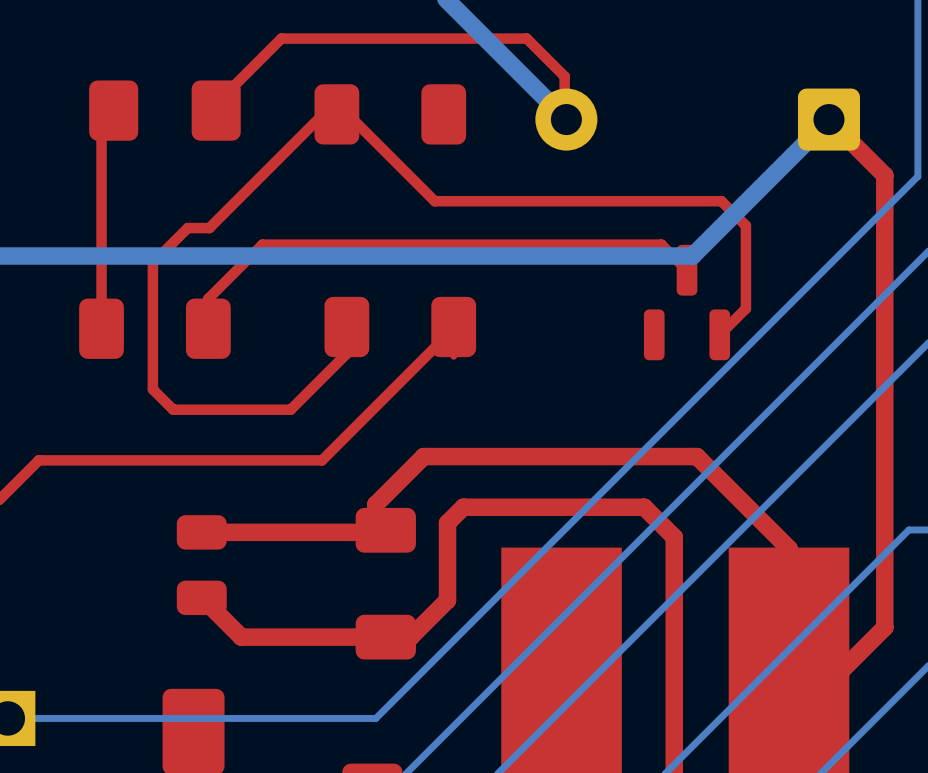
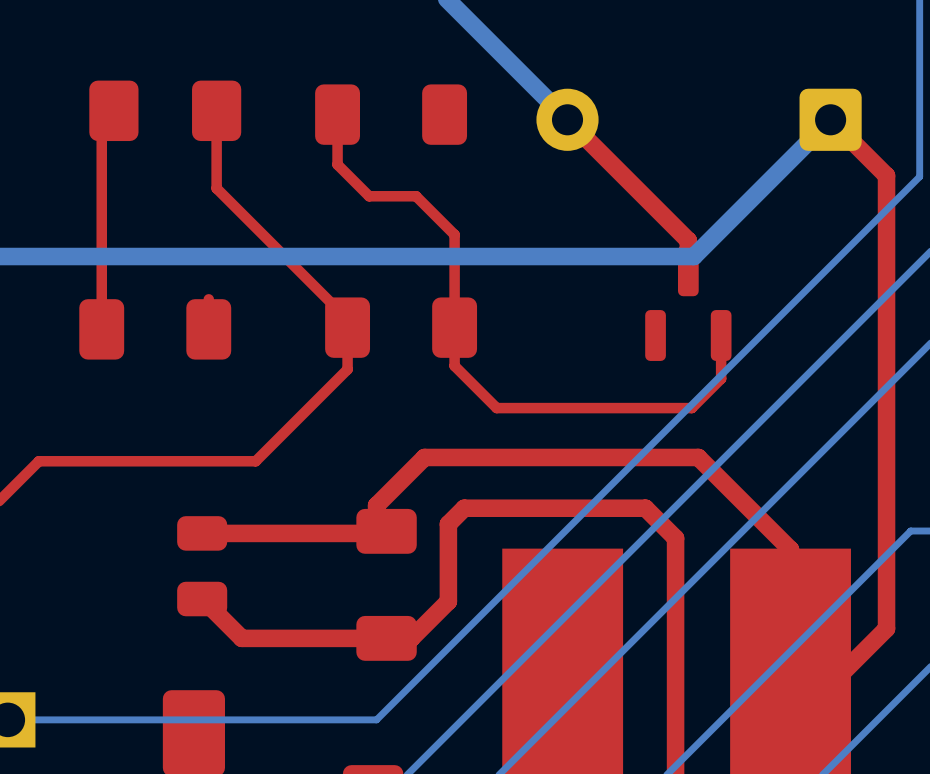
top track: (216, 103) (281, 38) (526, 38) (564, 76) (564, 117) -> none
top track: (323, 114) (209, 228) (187, 228) (152, 262) (152, 389) (173, 409) (290, 409) (346, 353) -> none
top track: (336, 114) (347, 114) (434, 201) (721, 201) (745, 225) (745, 308) (719, 334) -> (337, 114) (337, 164) (369, 196) (416, 196) (454, 234) (454, 327) (454, 306)
top track: none -> (216, 128) (216, 188) (347, 319) (347, 327)
top track: (687, 270) (661, 244) (262, 244) (208, 298) -> (688, 270) (688, 240) (567, 119)
top track: (453, 327) (322, 460) (255, 460) -> (347, 354) (347, 369) (255, 461)
top track: none -> (721, 335) (721, 378) (691, 408) (496, 408) (454, 365) (454, 356)

